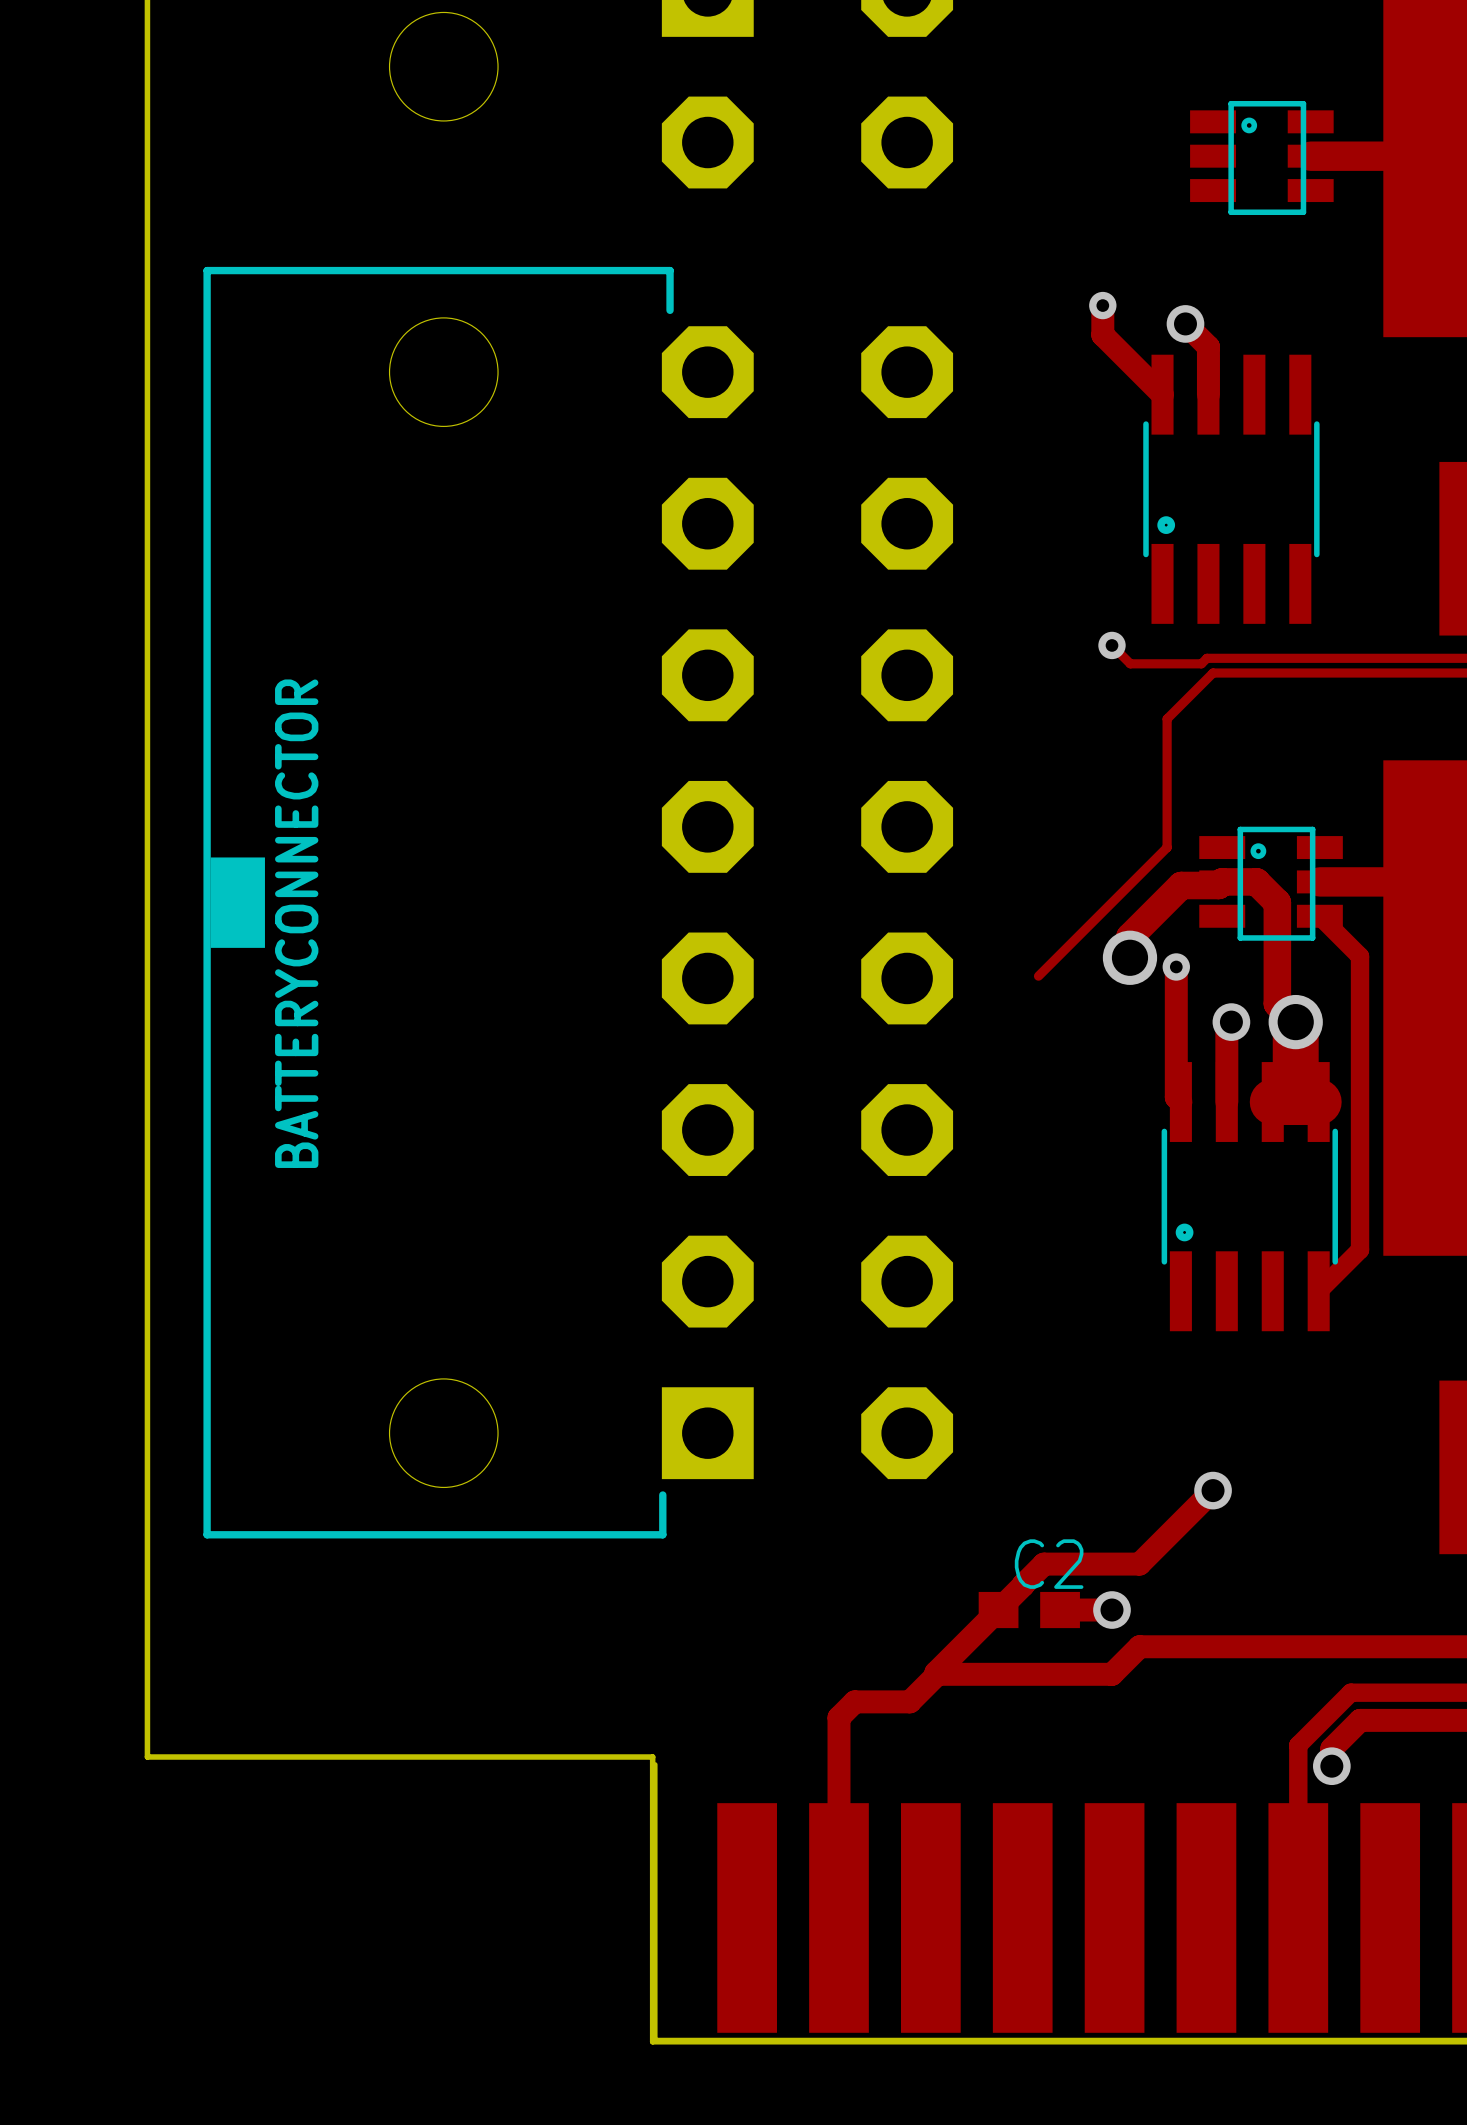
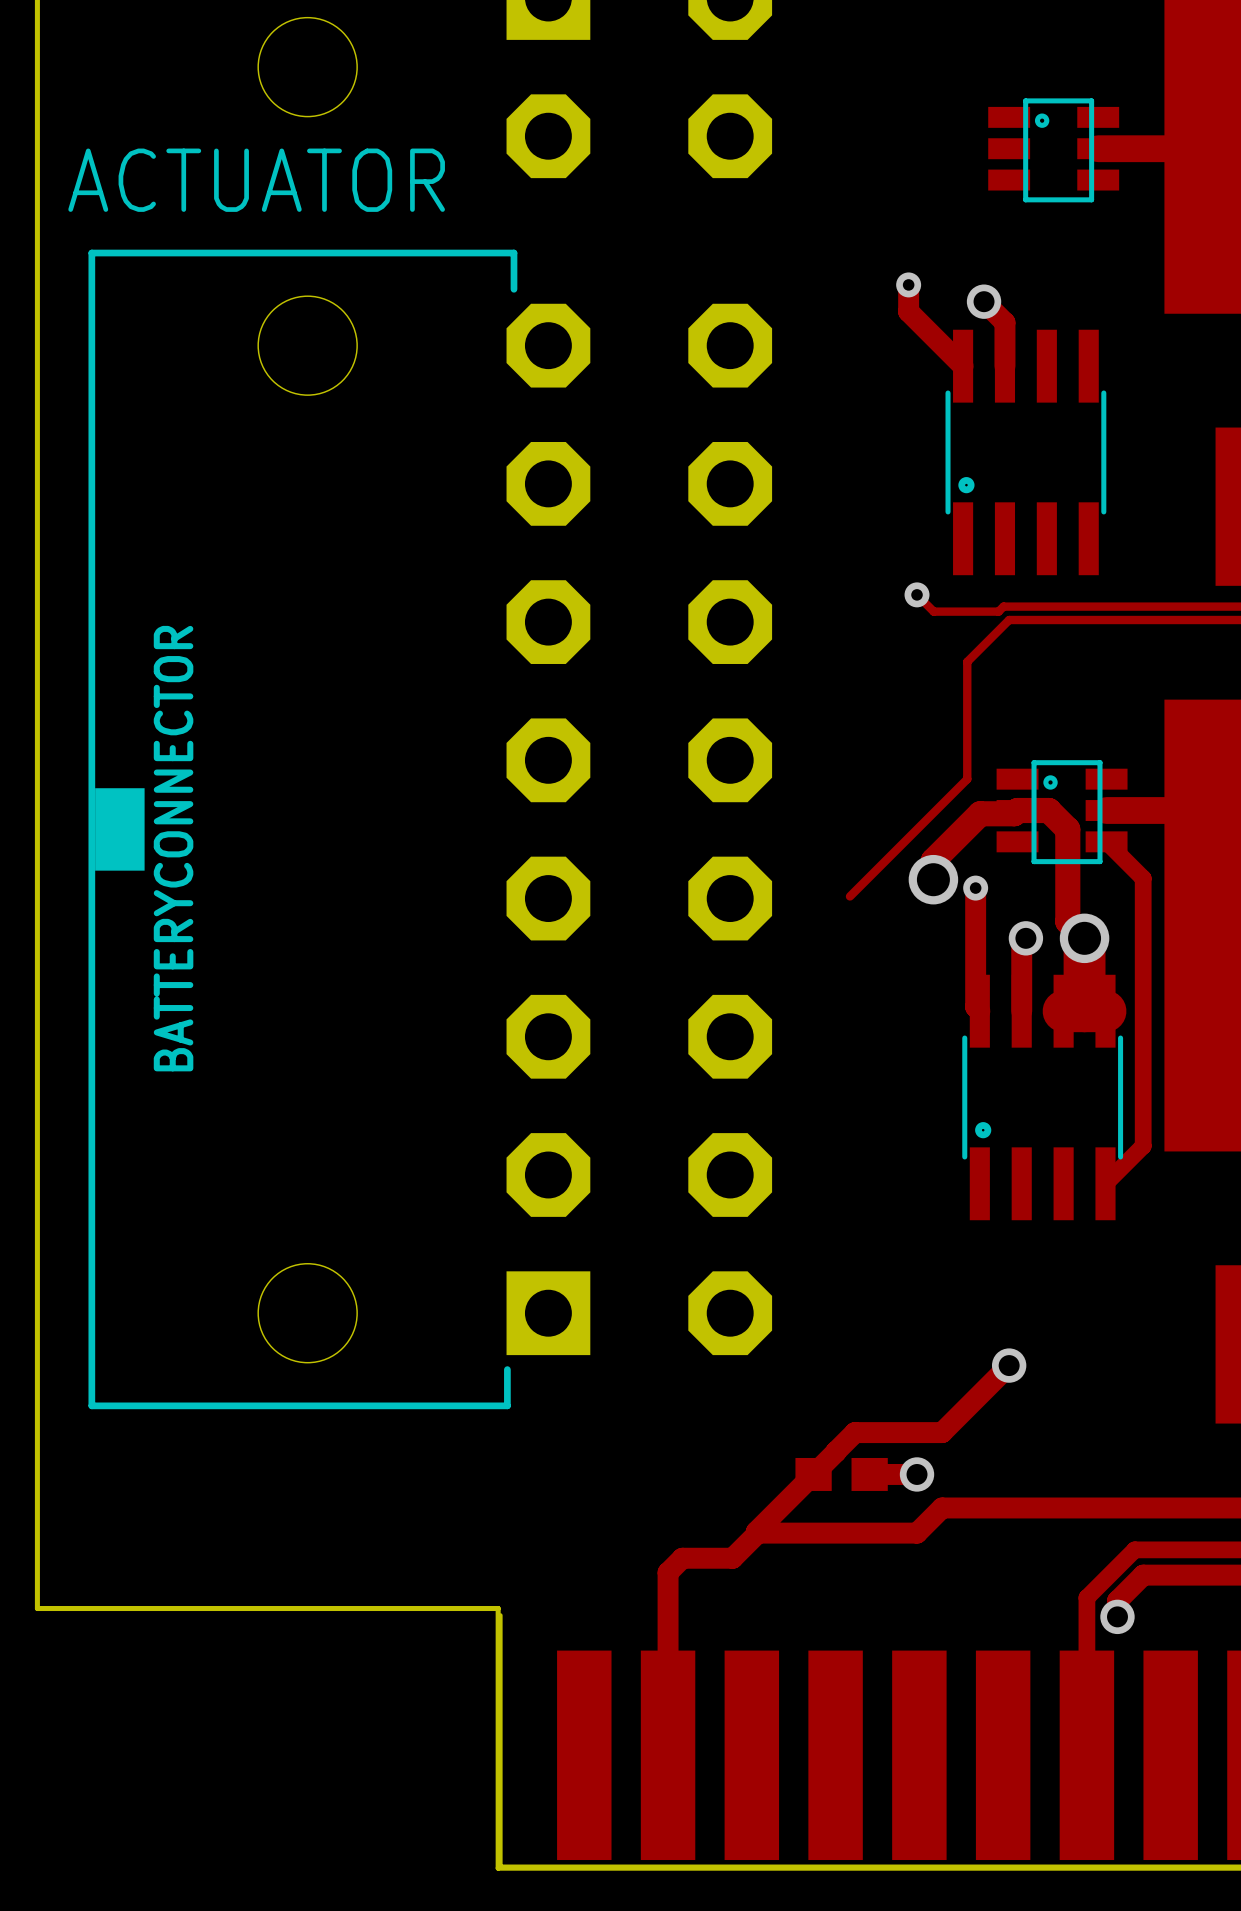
text: none -> ACTUATOR (256, 180)
C2 name: C2 (1049, 1564) -> none

